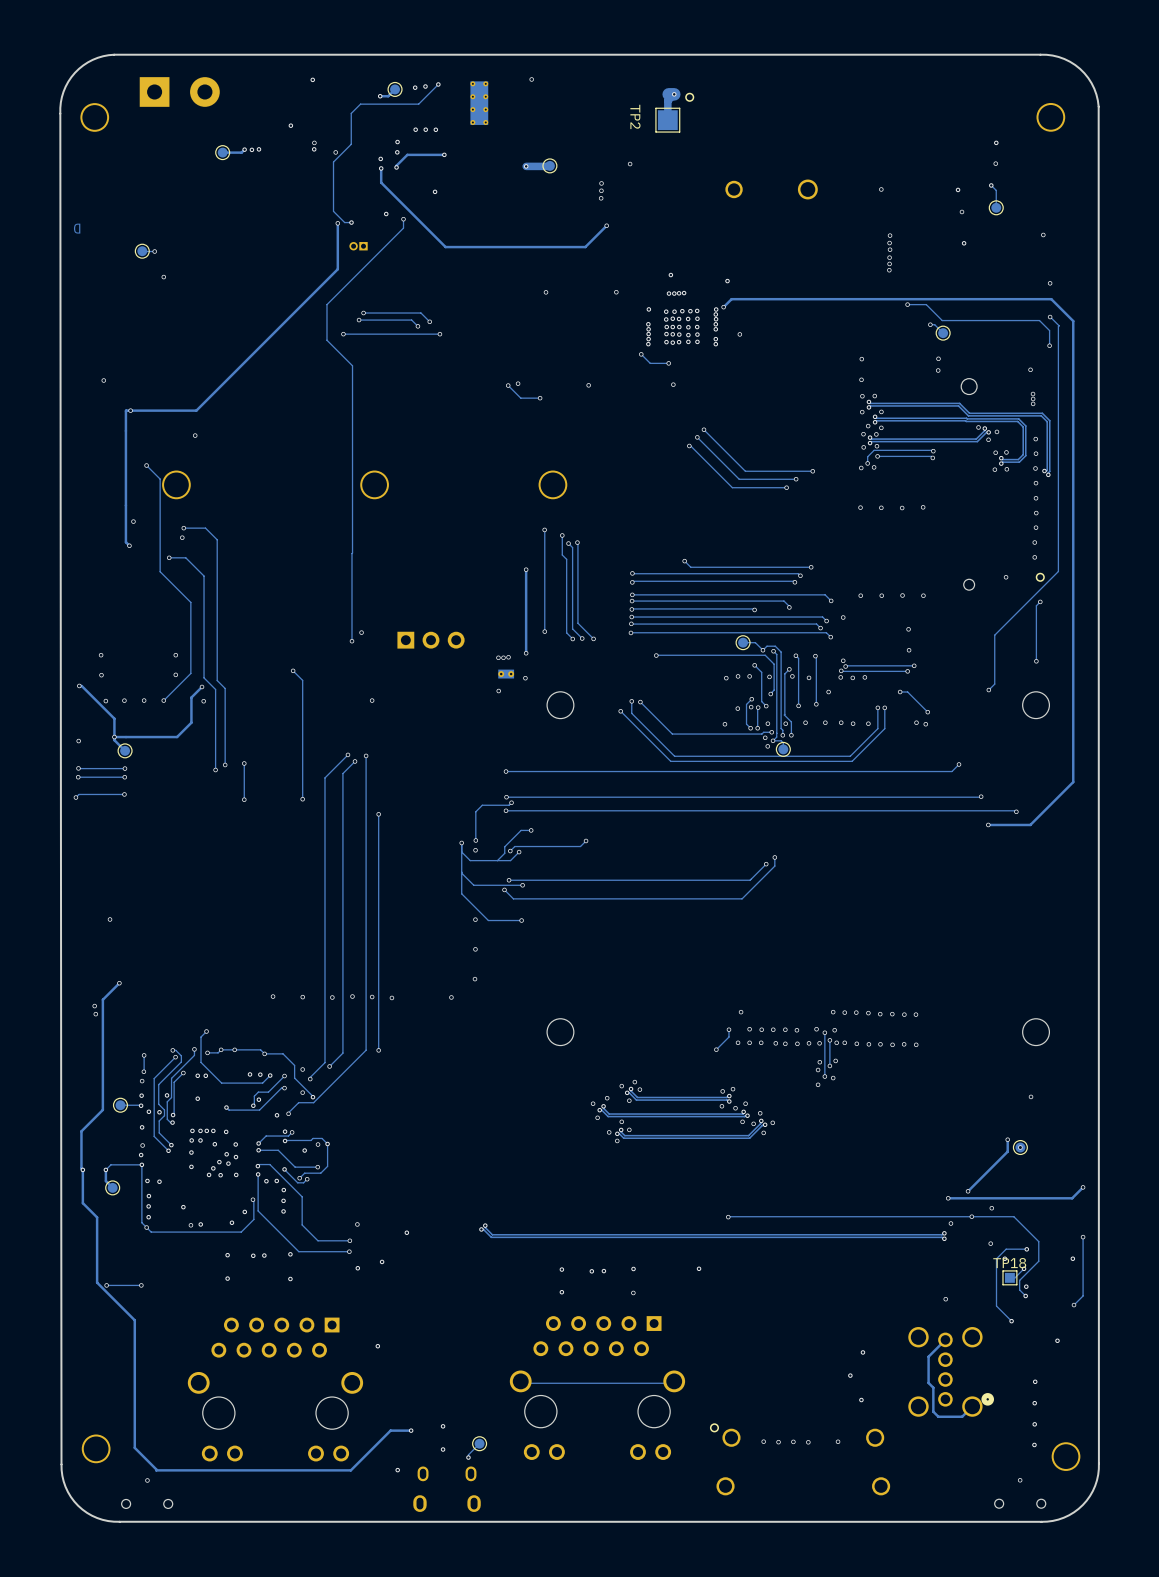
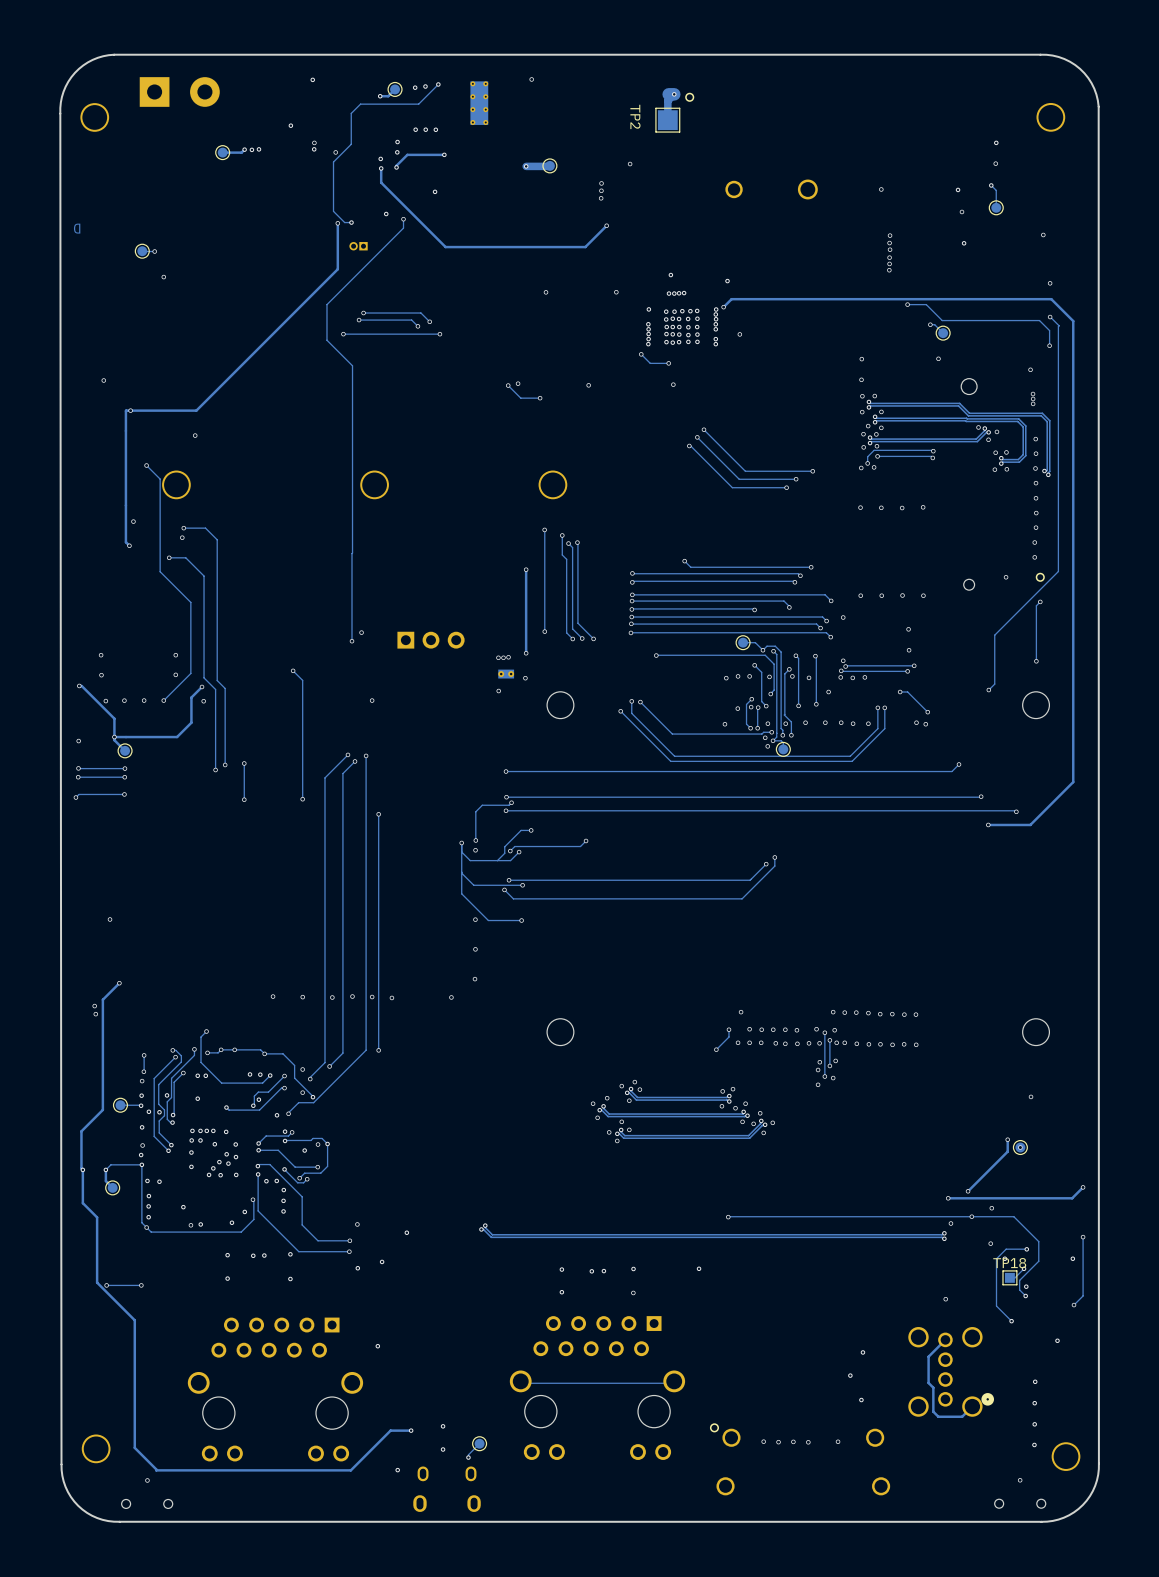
via: (938, 370) -> none

